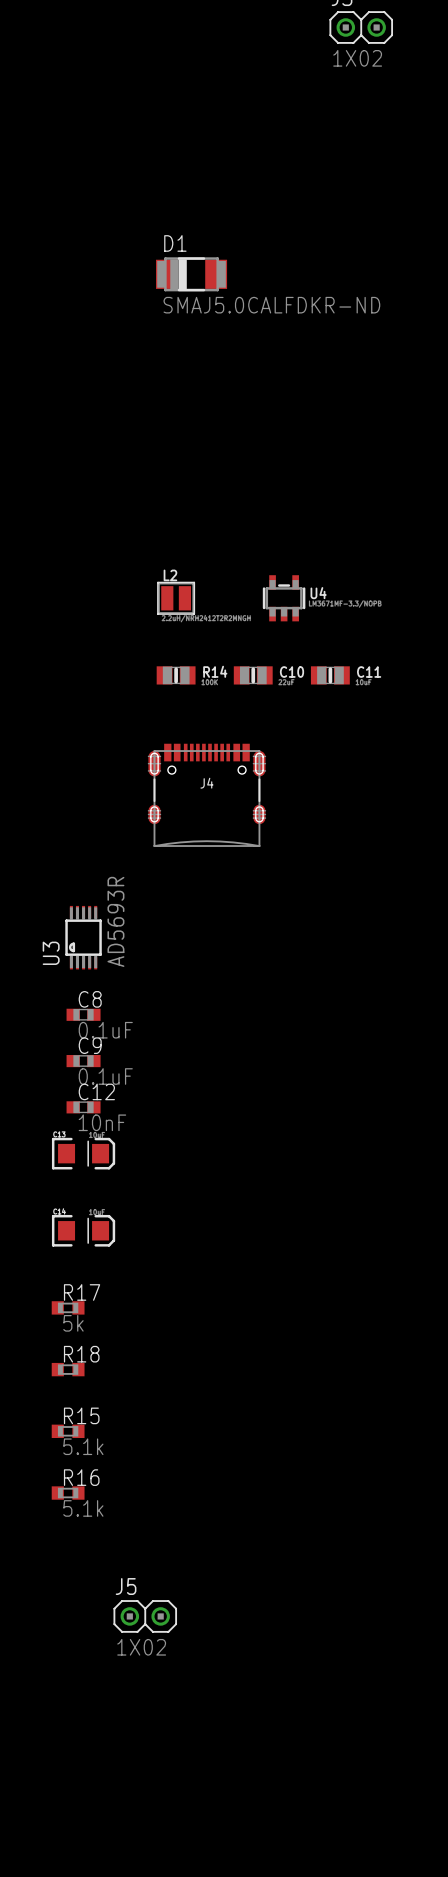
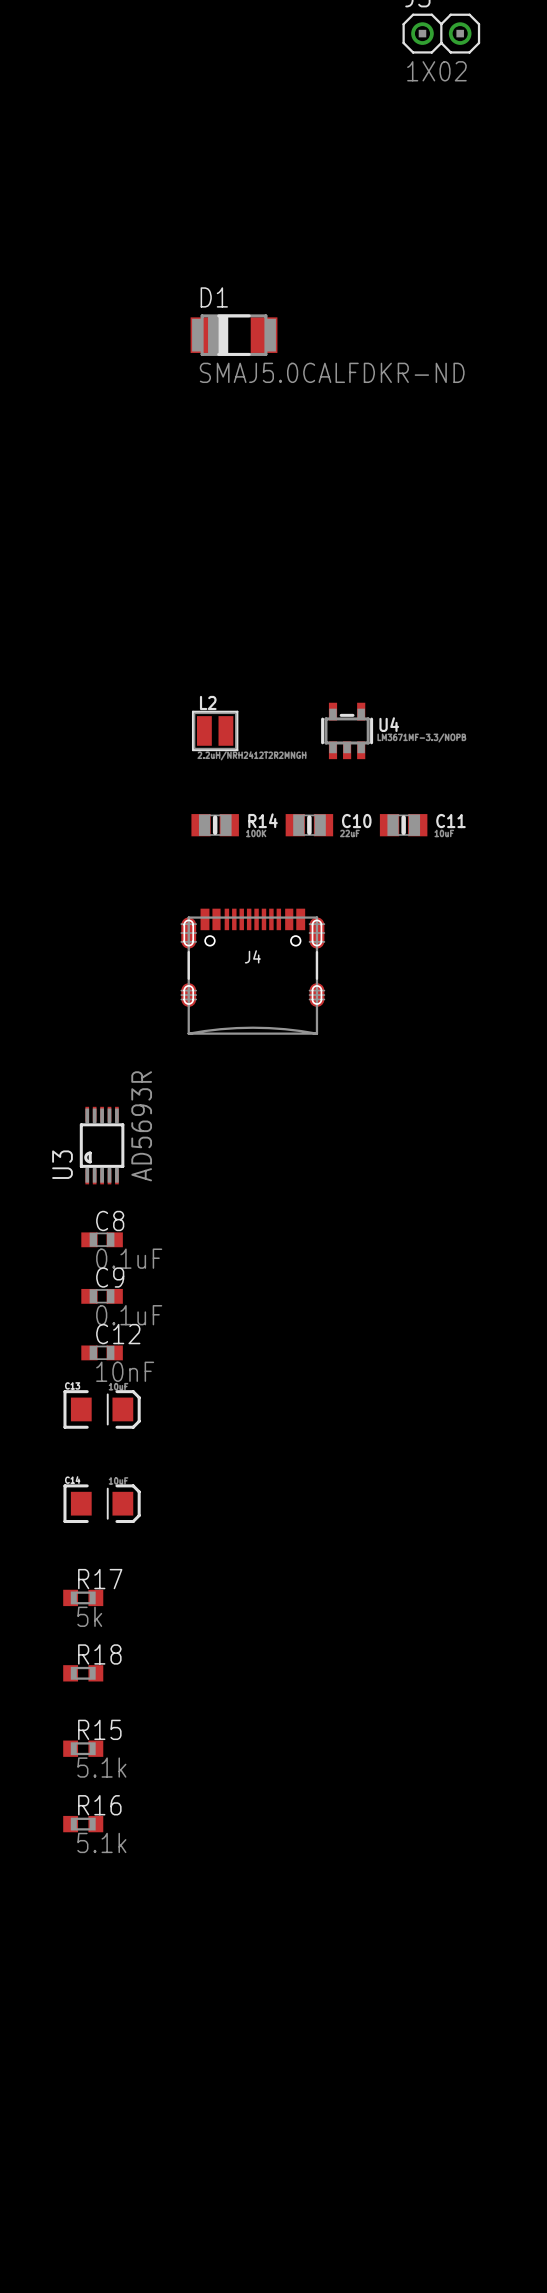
J5: 1X02 (145, 1616) -> none

